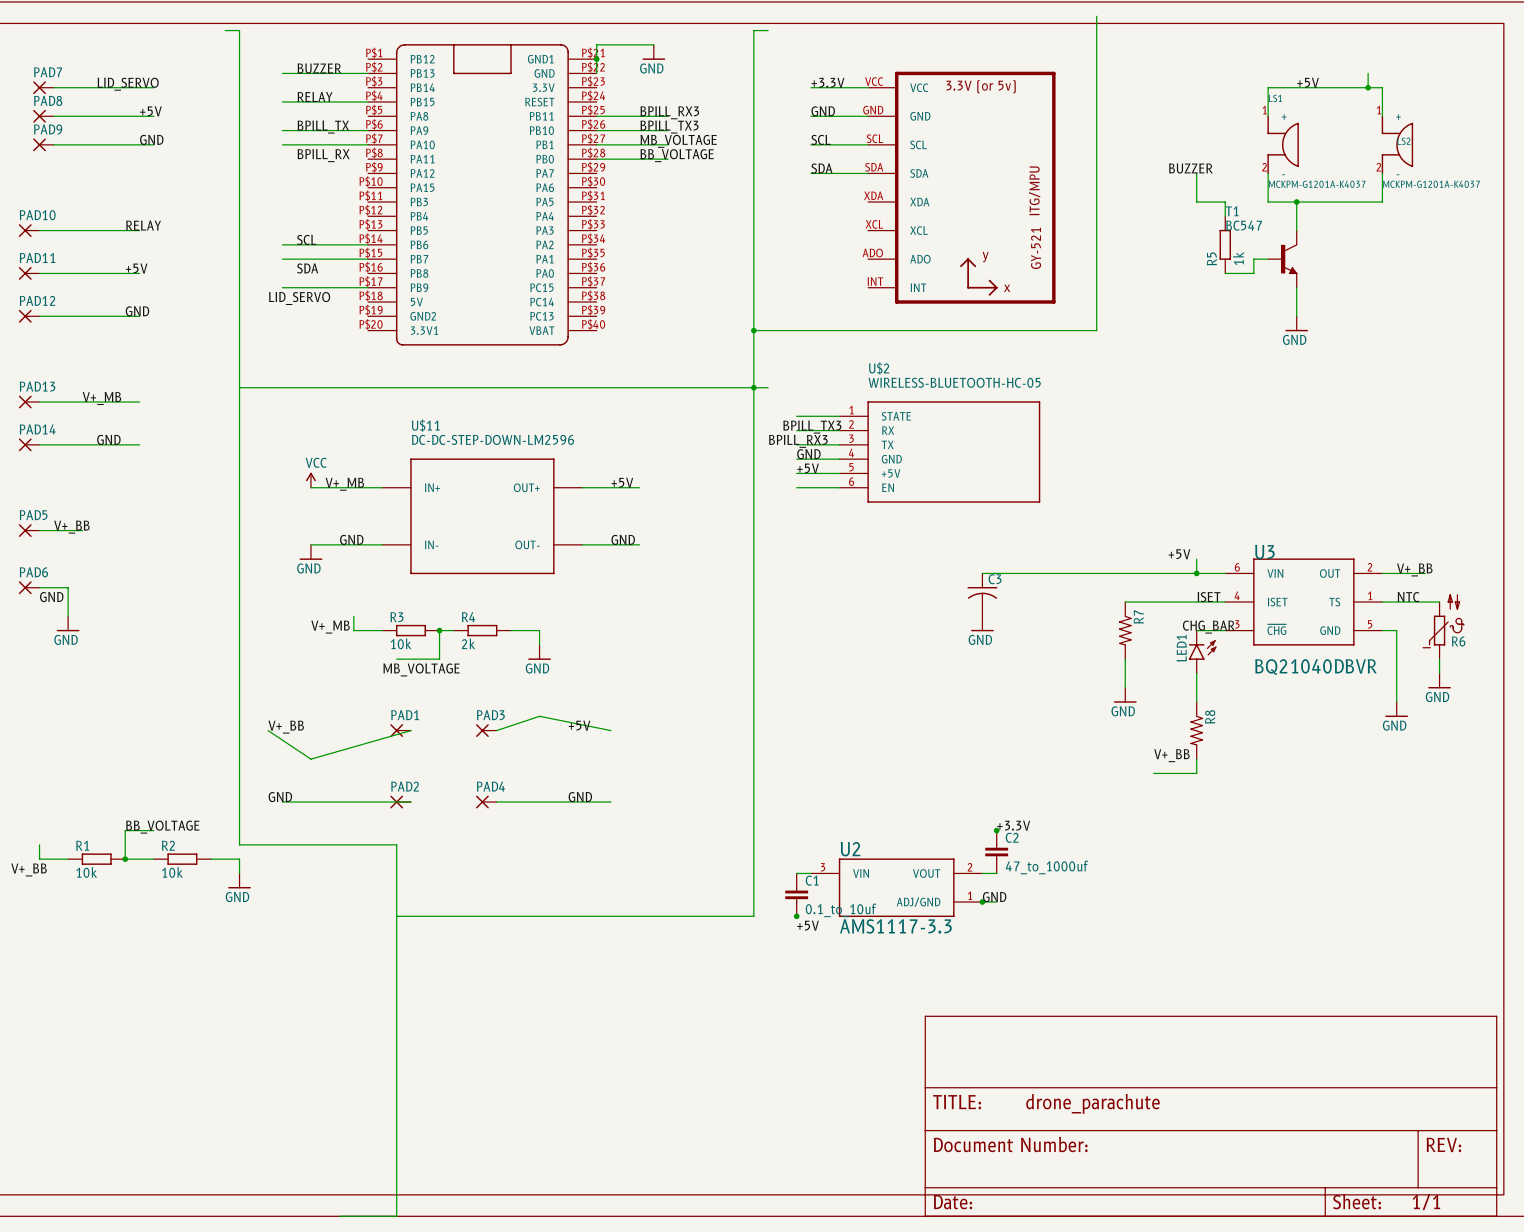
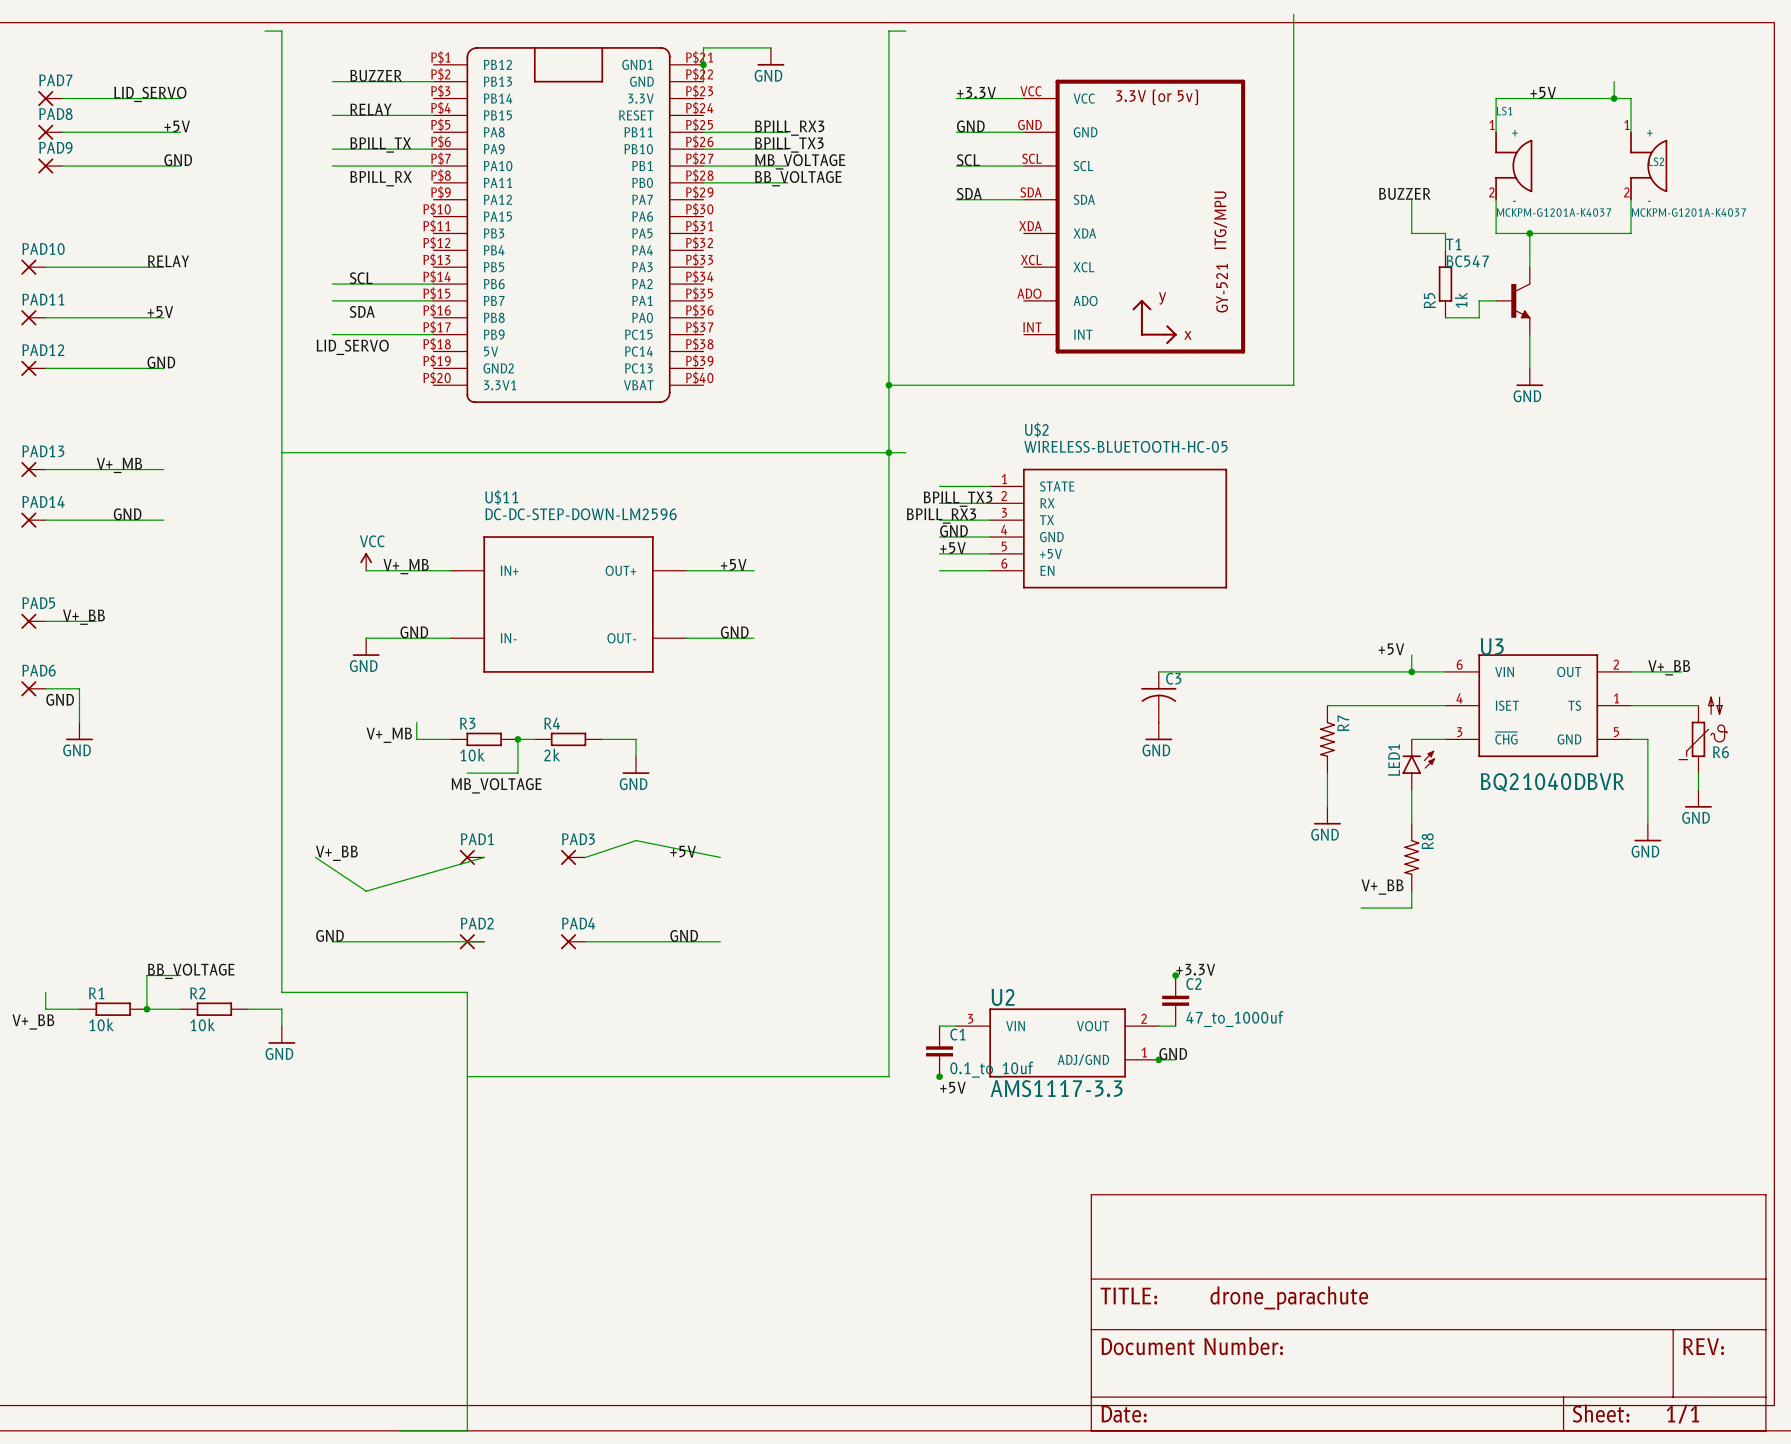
label: ISET (1209, 597) -> none
label: NTC (1408, 597) -> none
label: CHG_BAR (1208, 627) -> none

